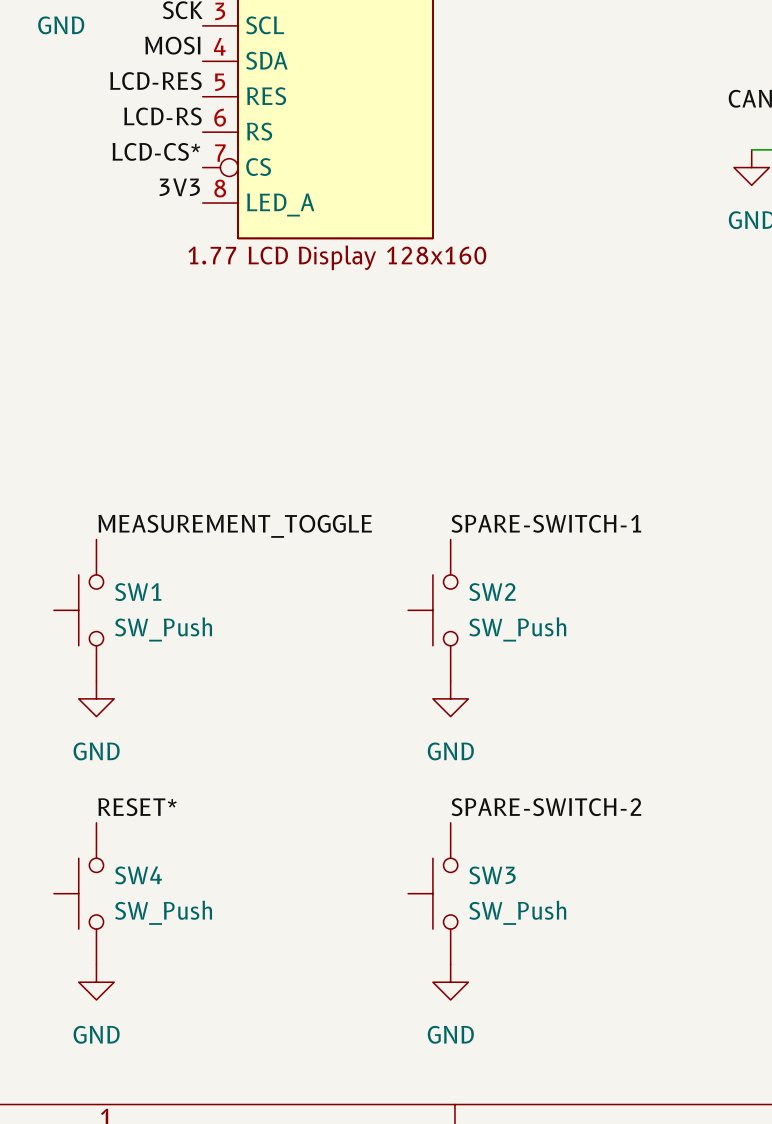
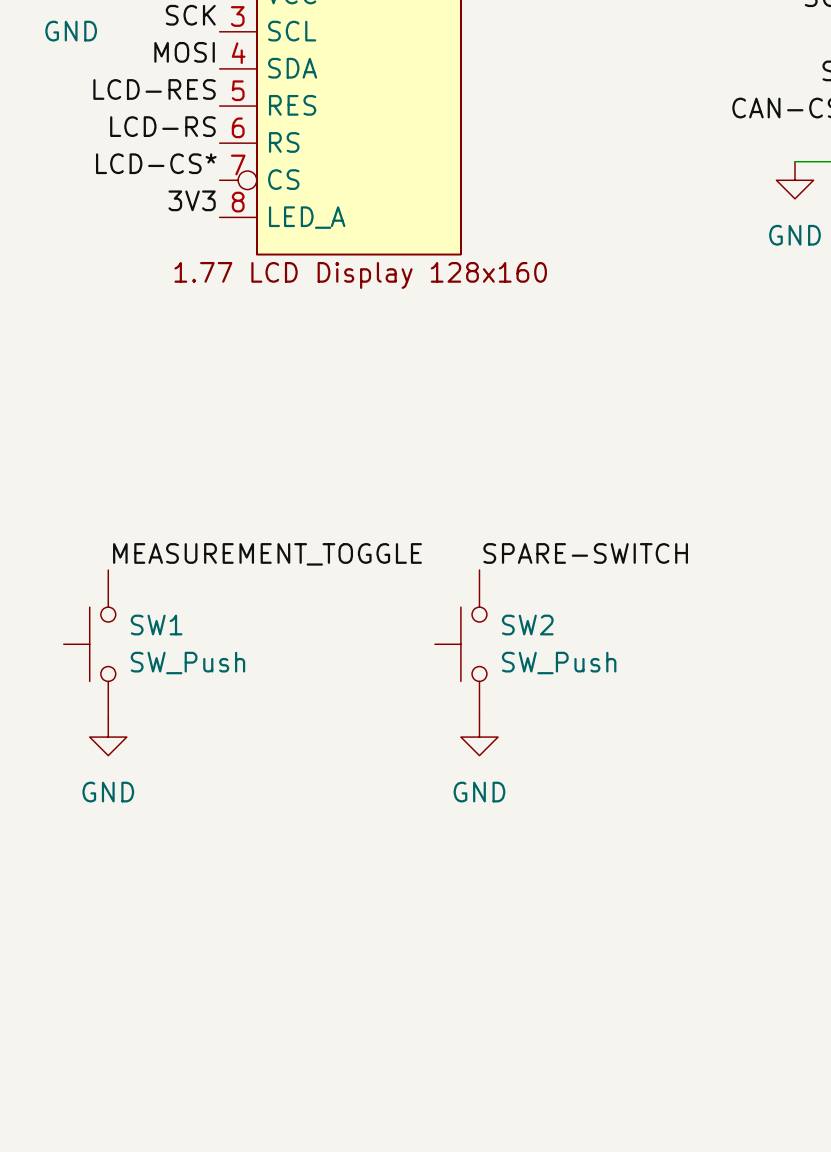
label: SPARE-SWITCH-1 (546, 523) -> SPARE-SWITCH (585, 553)
label: RESET* (137, 807) -> none
label: SPARE-SWITCH-2 (546, 807) -> none
SW4: SW_Push (78, 893) -> none
SW3: SW_Push (432, 893) -> none
power symbol: GND (96, 982) -> none
power symbol: GND (450, 982) -> none

